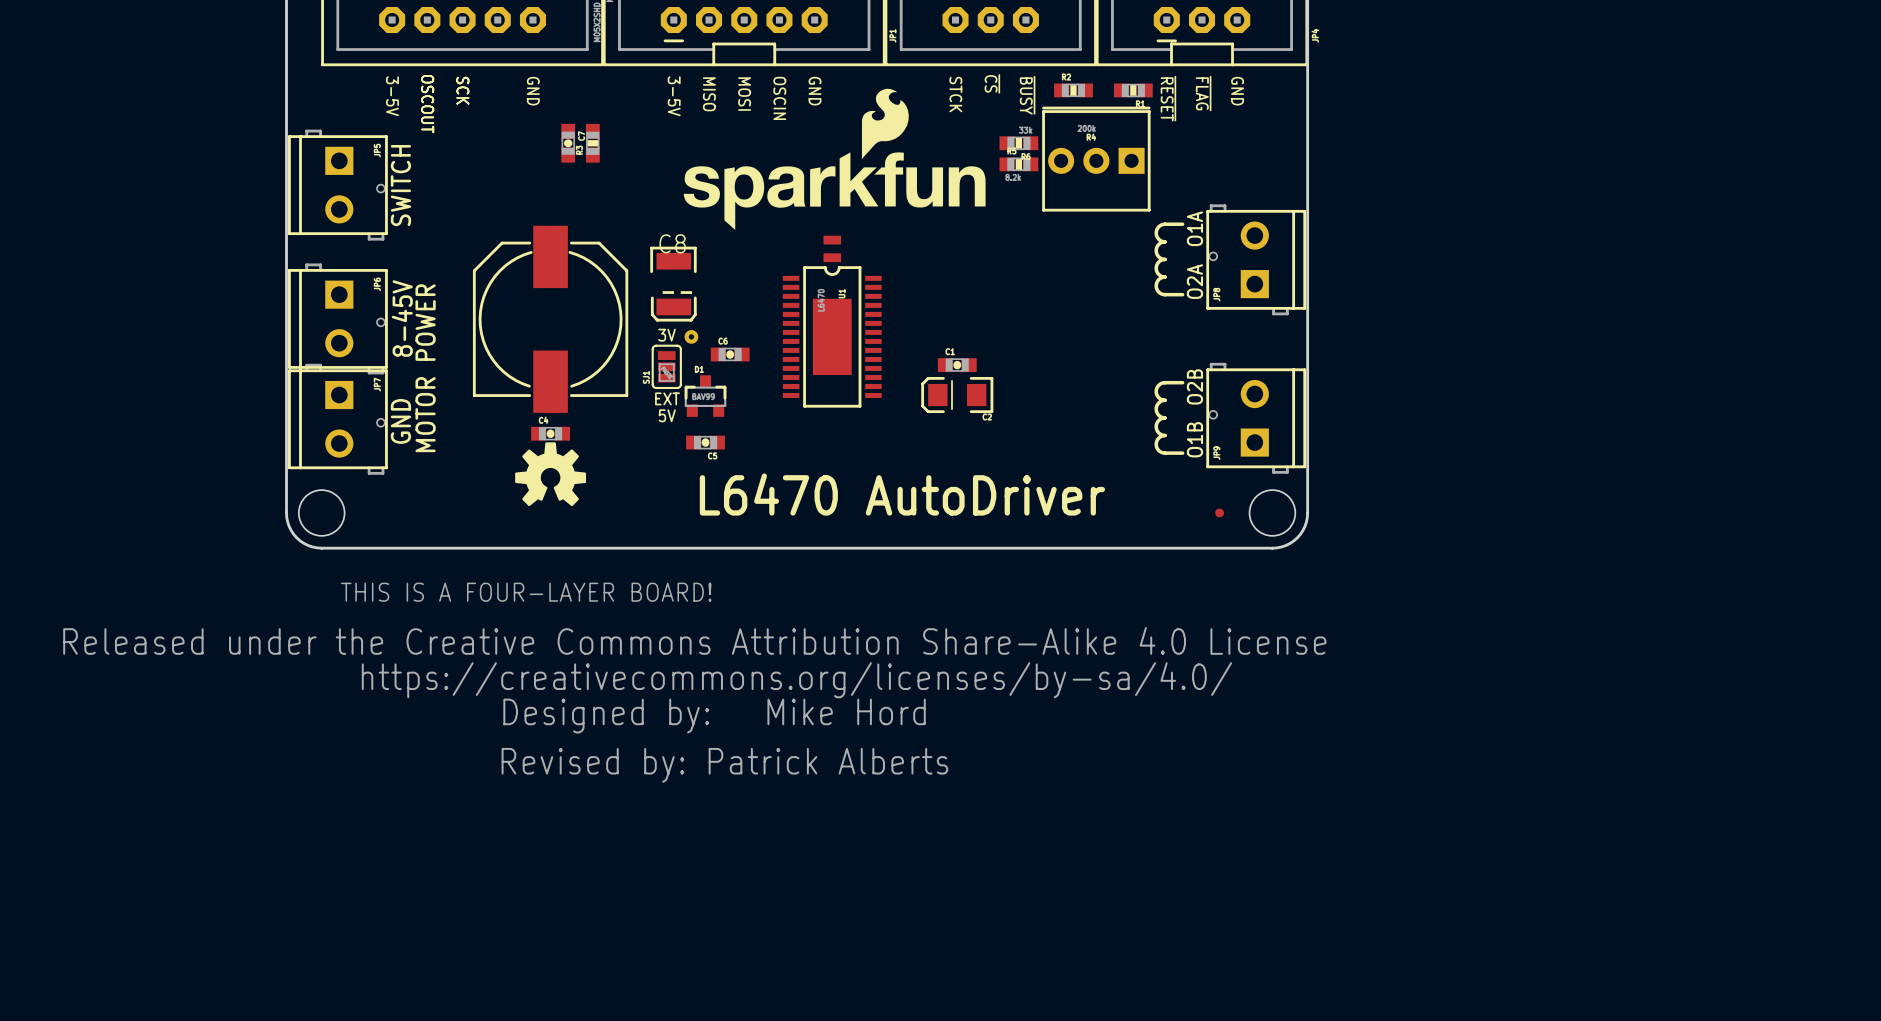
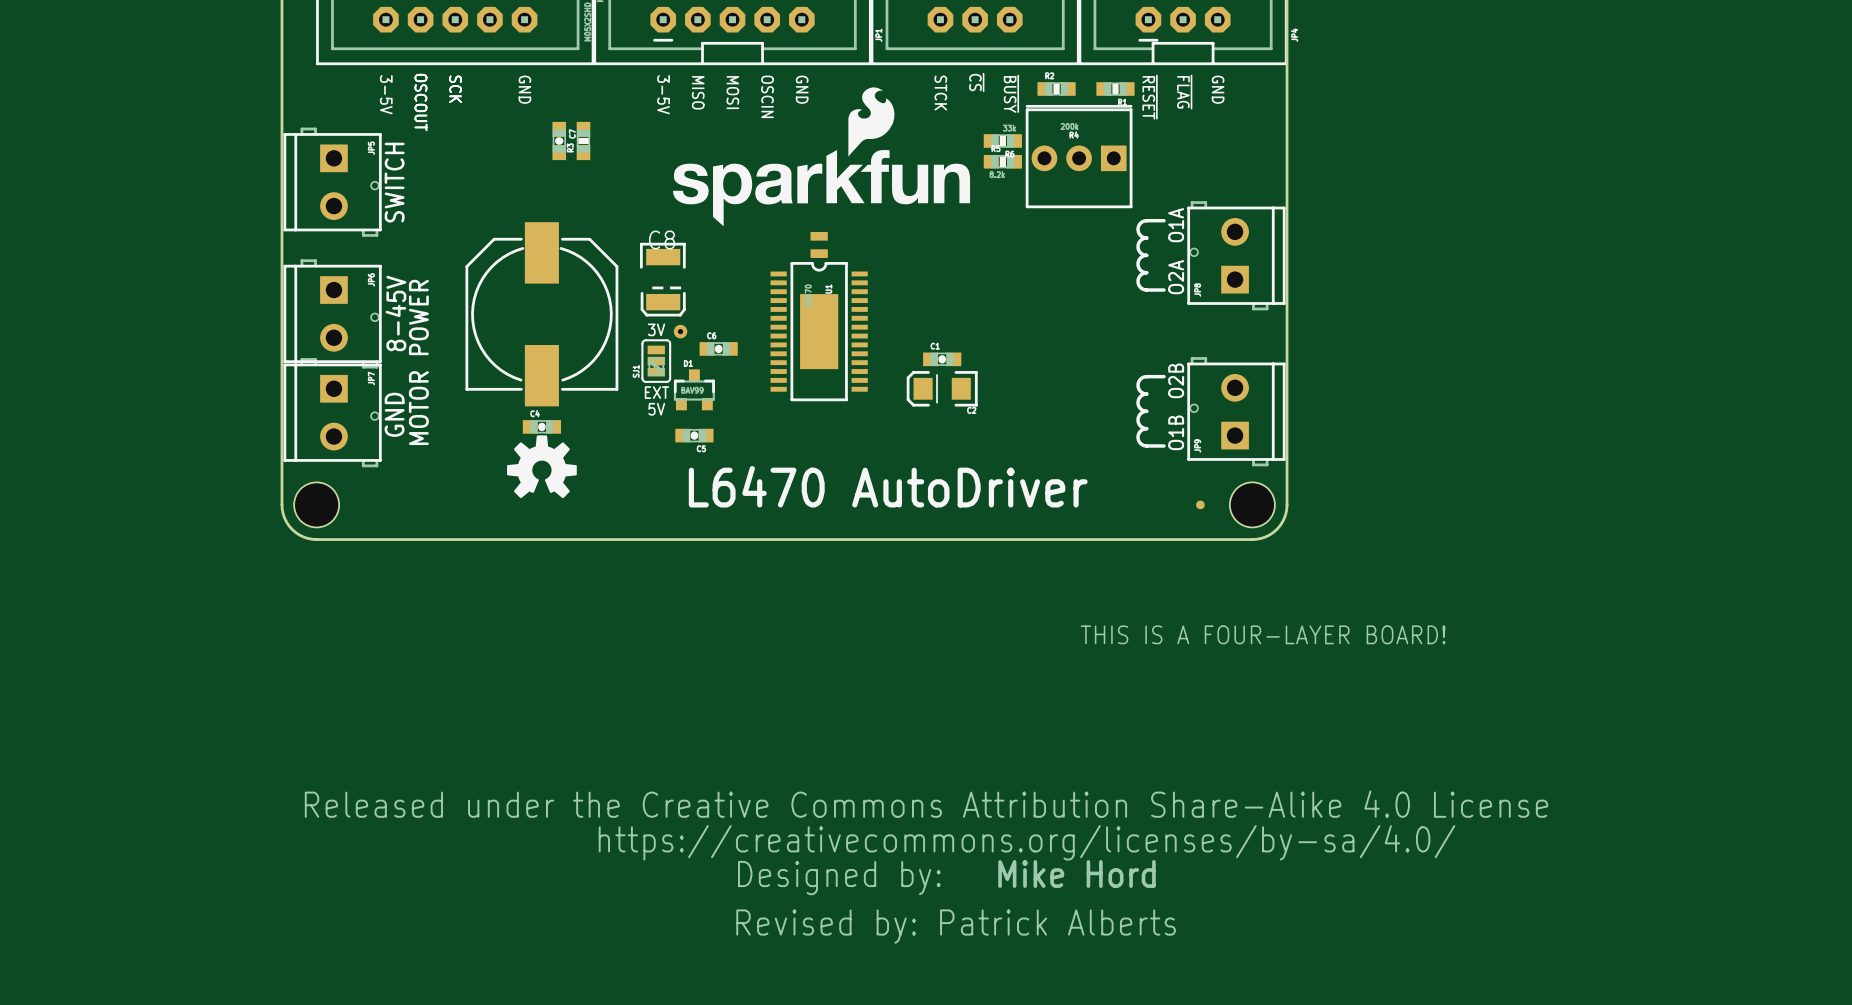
drawing: [63, 582, 1327, 734] -> none
drawing: none -> [1080, 625, 1446, 645]
text position: Revised by: Patrick Alberts (724, 765) -> Revised by: Patrick Alberts (956, 926)
drawing: none -> [304, 790, 1549, 896]
text: none -> Mike Hord (1076, 874)

